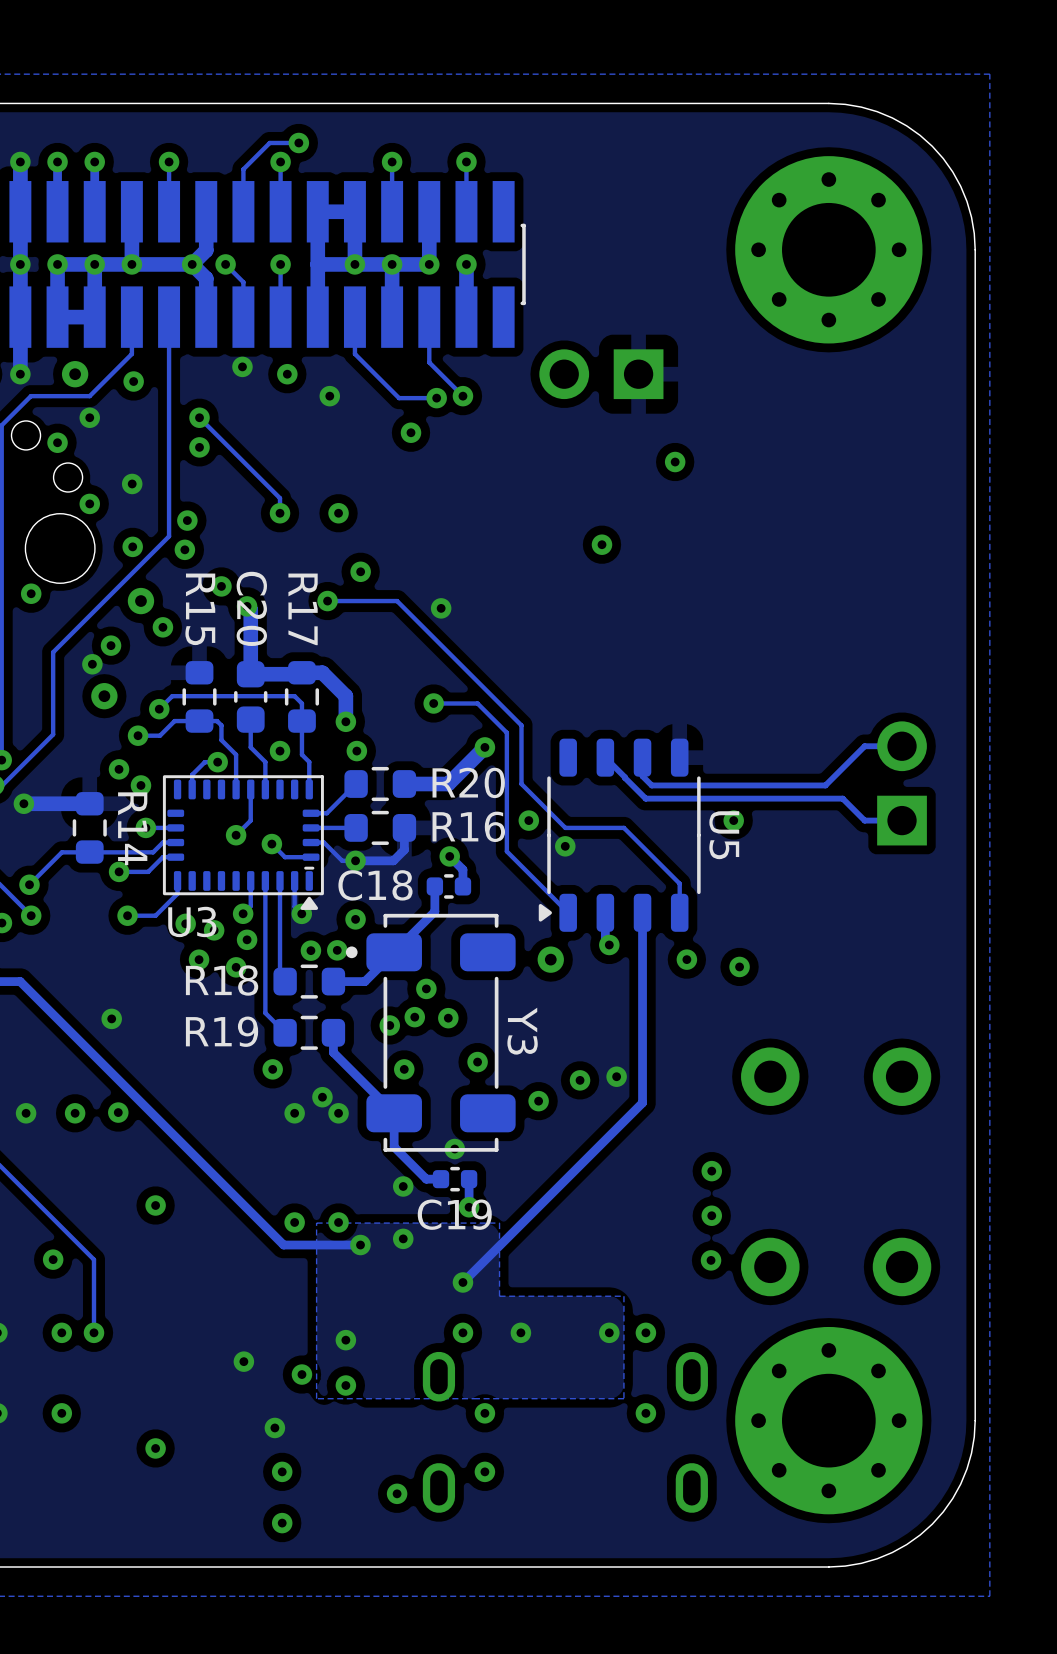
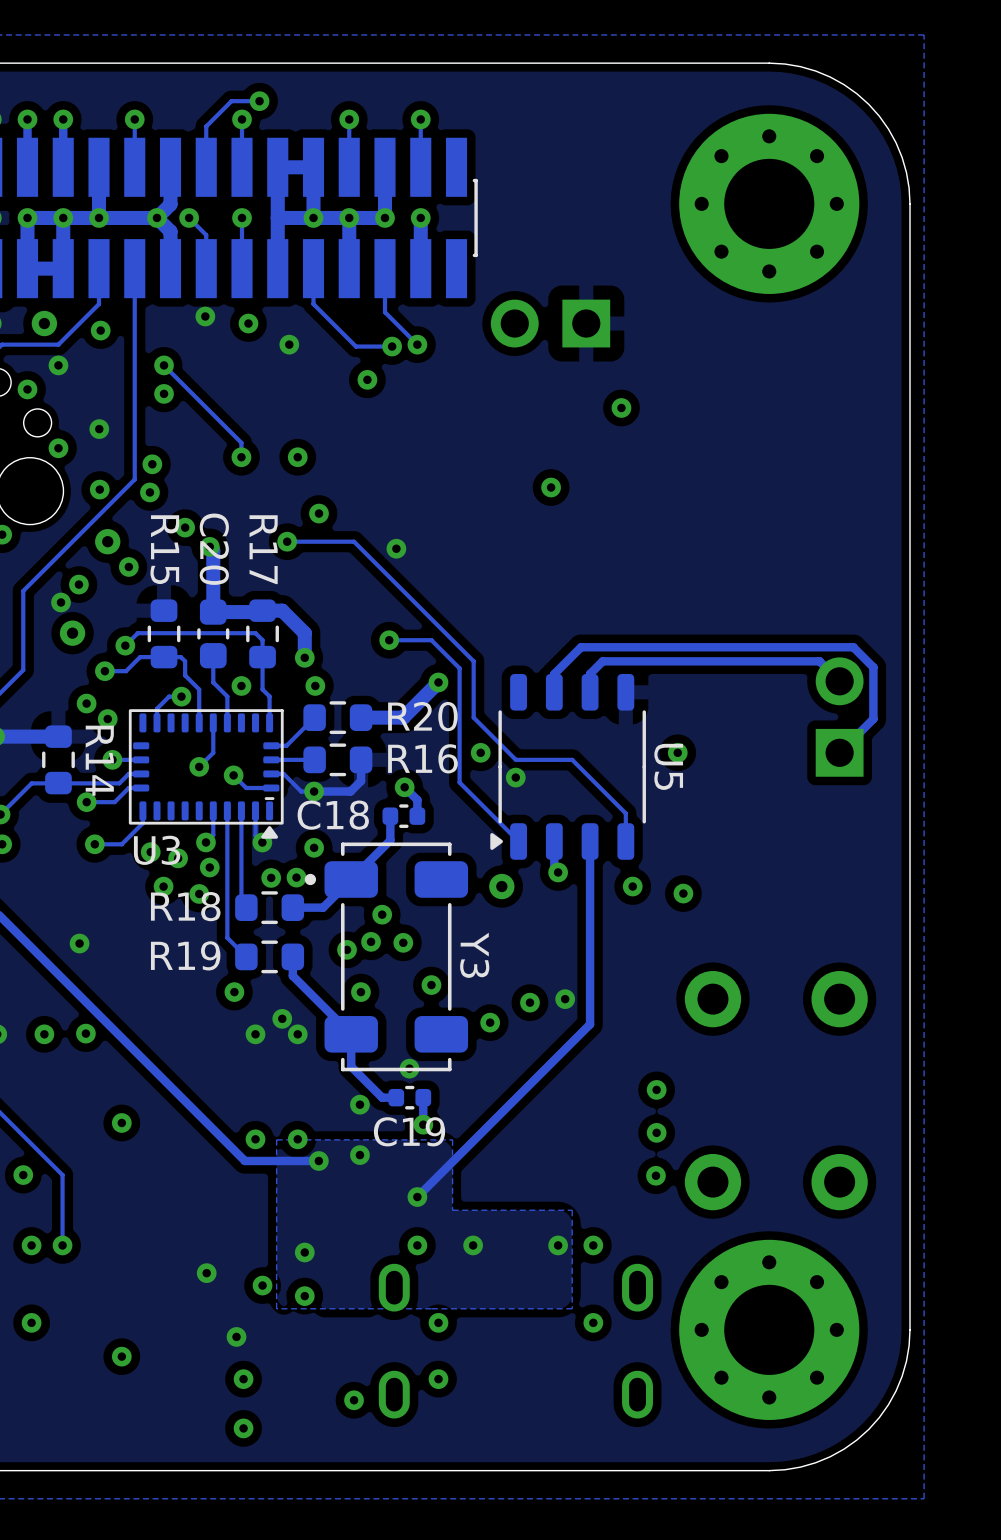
track: (902, 746) (864, 746) (825, 785) (651, 785) (642, 776) (642, 757) -> (839, 681) (819, 661) (602, 661) (590, 674) (590, 692)
track: (605, 757) (645, 798) (842, 798) (864, 820) (902, 820) -> (554, 692) (554, 674) (581, 647) (853, 647) (873, 667) (873, 719) (839, 752)

